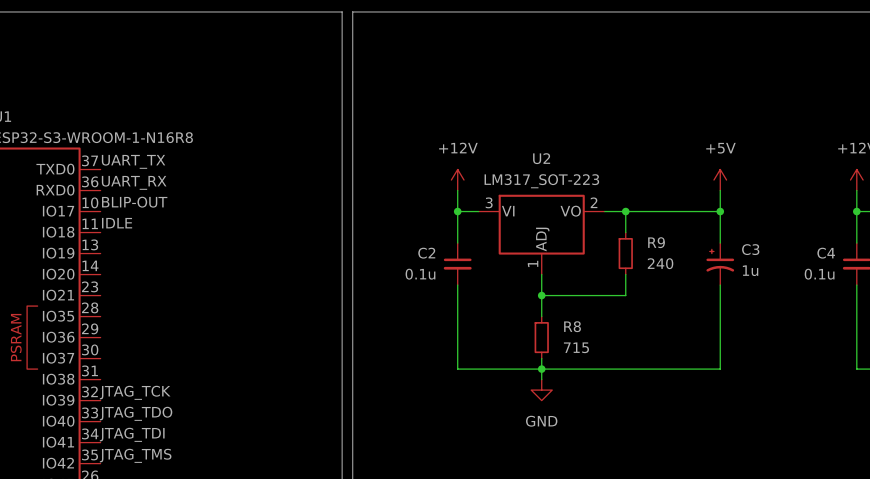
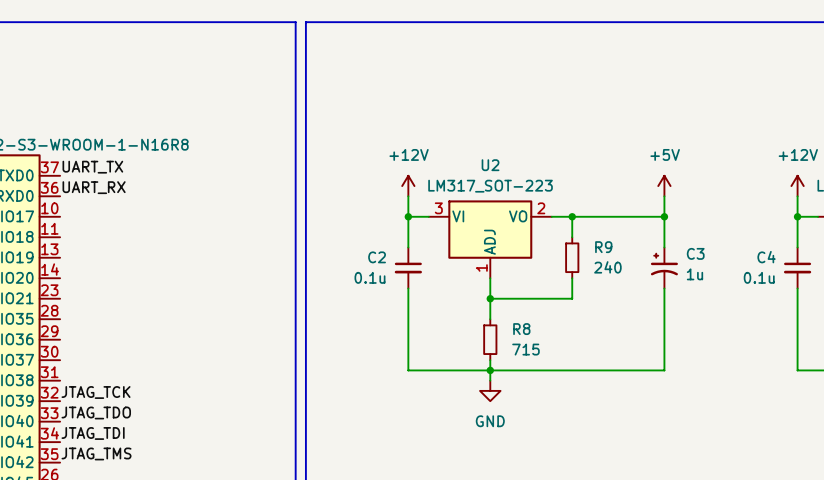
label: BLIP-OUT (134, 202) -> none
label: IDLE (117, 223) -> none

